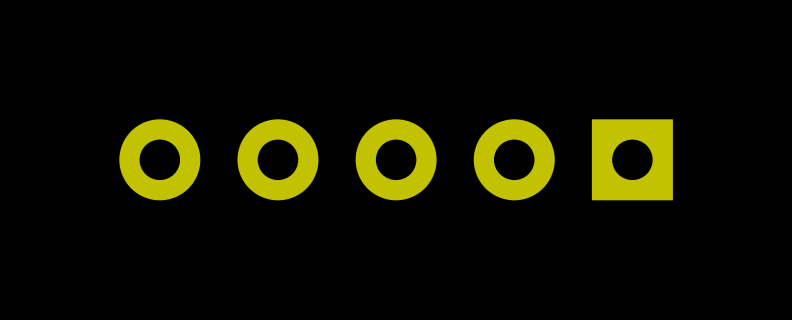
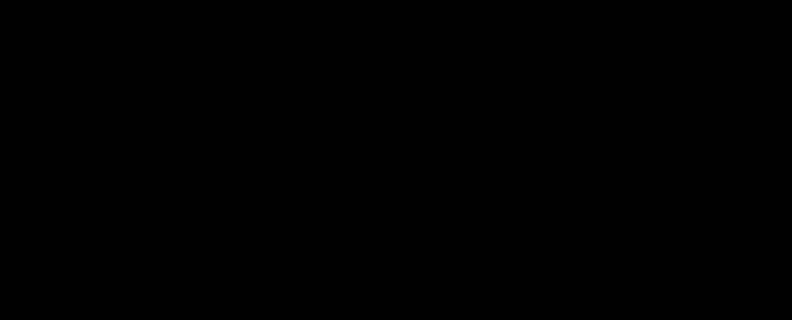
part: (396, 159) -> none

